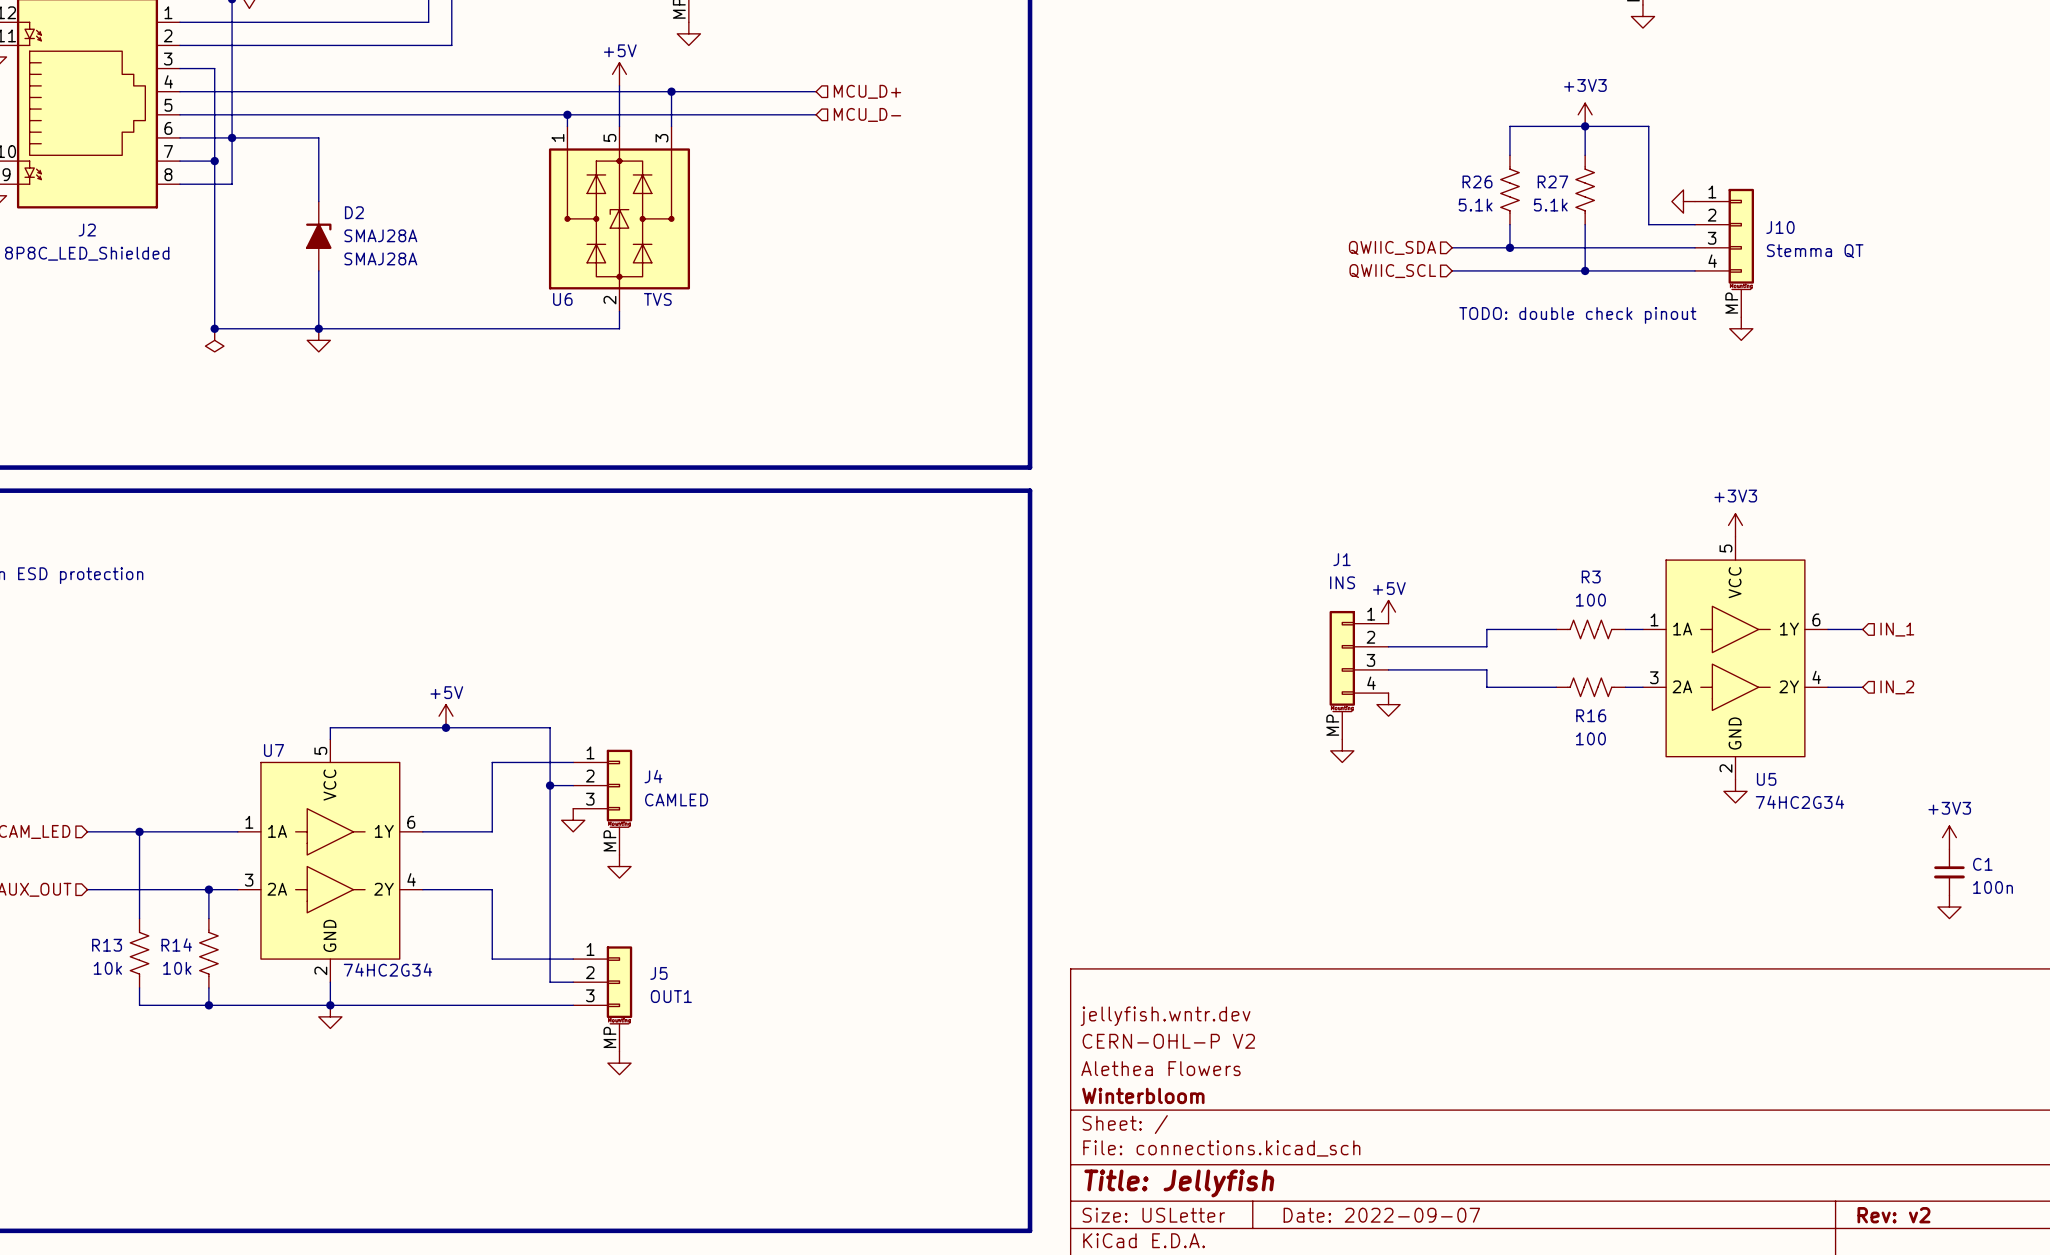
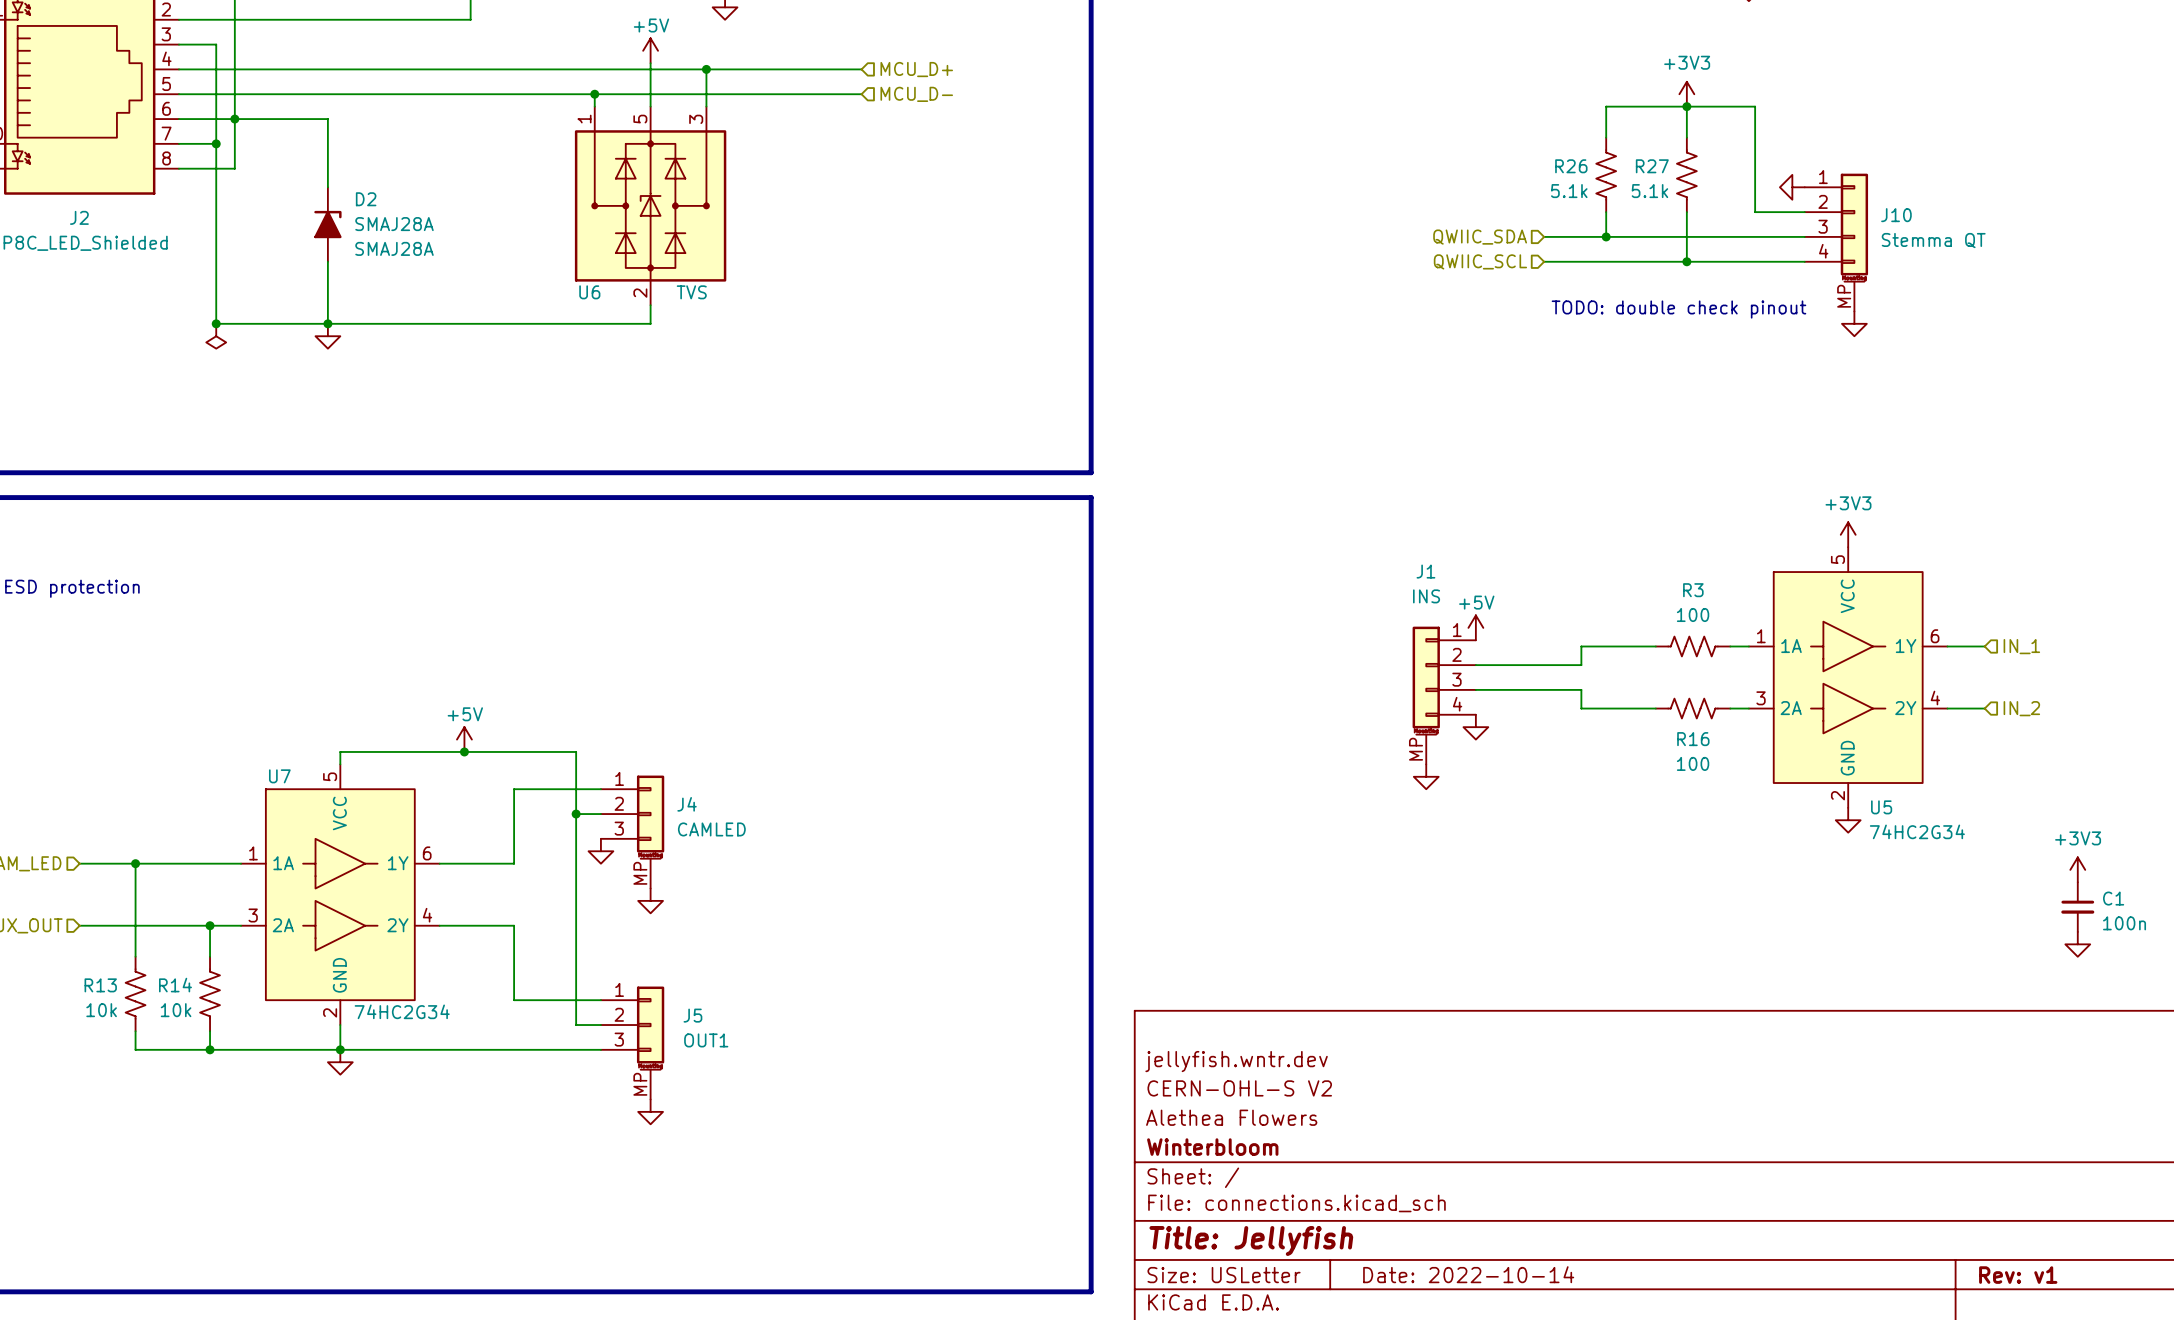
title block: CERN-OHL-P V2 (1168, 1041) -> CERN-OHL-S V2 (1239, 1088)
title block: Date: 2022-09-07 (1381, 1215) -> Date: 2022-10-14 (1468, 1274)
title block: Rev: v2 (1893, 1215) -> Rev: v1 (2018, 1275)

